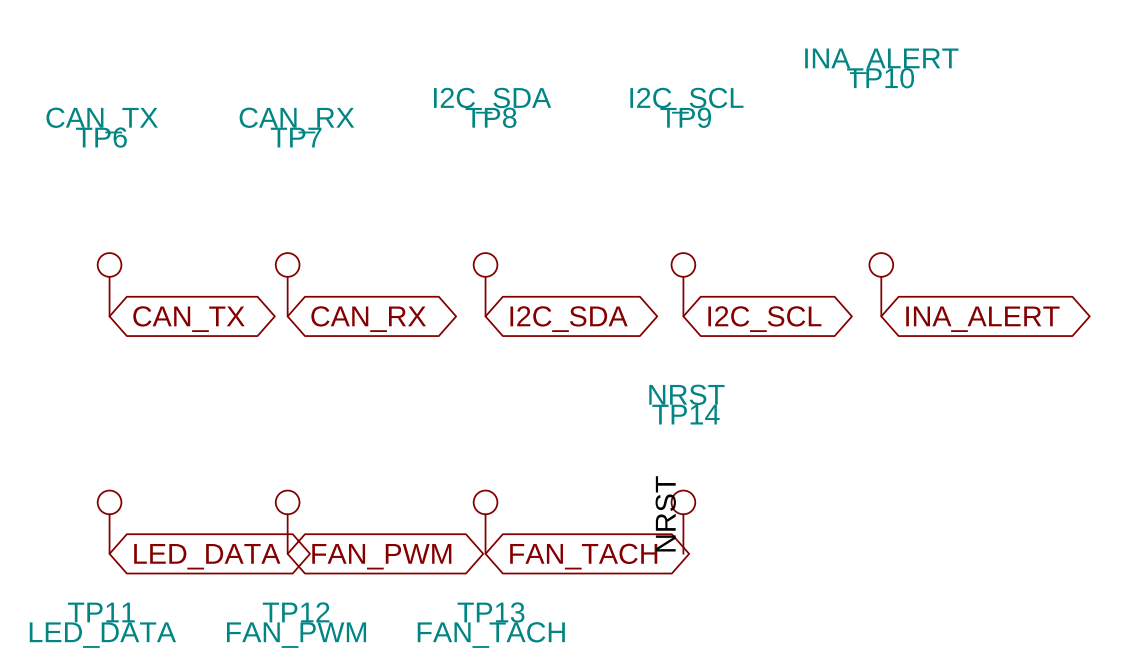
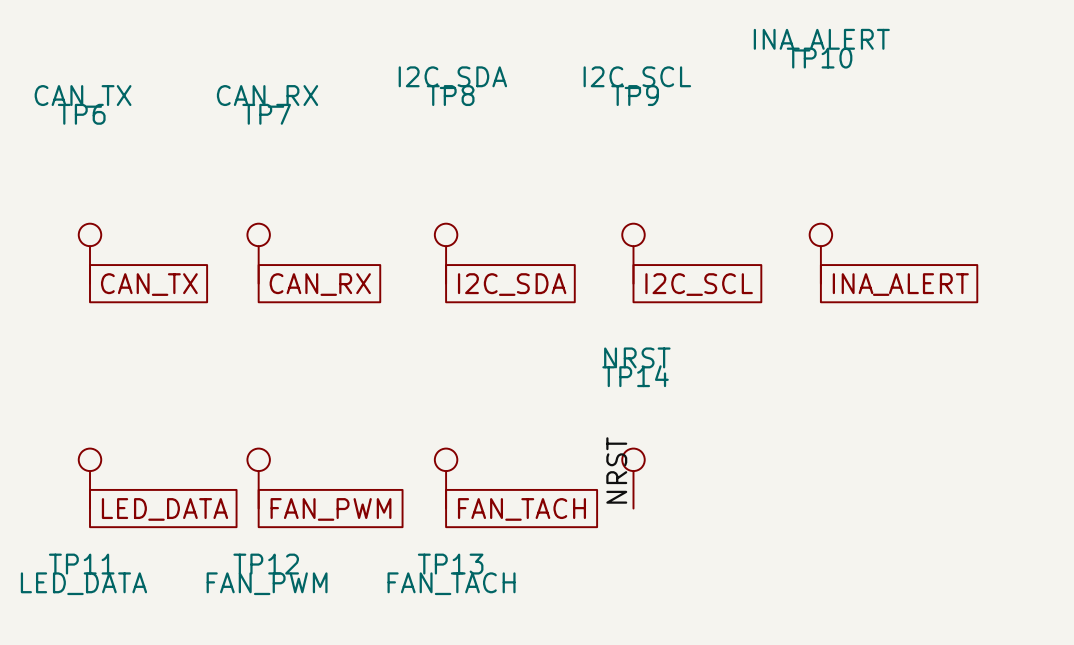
global label shape: bidirectional (188, 319) -> passive (149, 284)
global label shape: bidirectional (368, 319) -> passive (320, 284)
global label shape: bidirectional (569, 319) -> passive (512, 284)
global label shape: bidirectional (764, 319) -> passive (699, 284)
global label shape: bidirectional (982, 319) -> passive (900, 284)
global label shape: bidirectional (207, 556) -> passive (164, 509)
global label shape: bidirectional (381, 556) -> passive (330, 509)
global label shape: bidirectional (583, 556) -> passive (521, 509)

